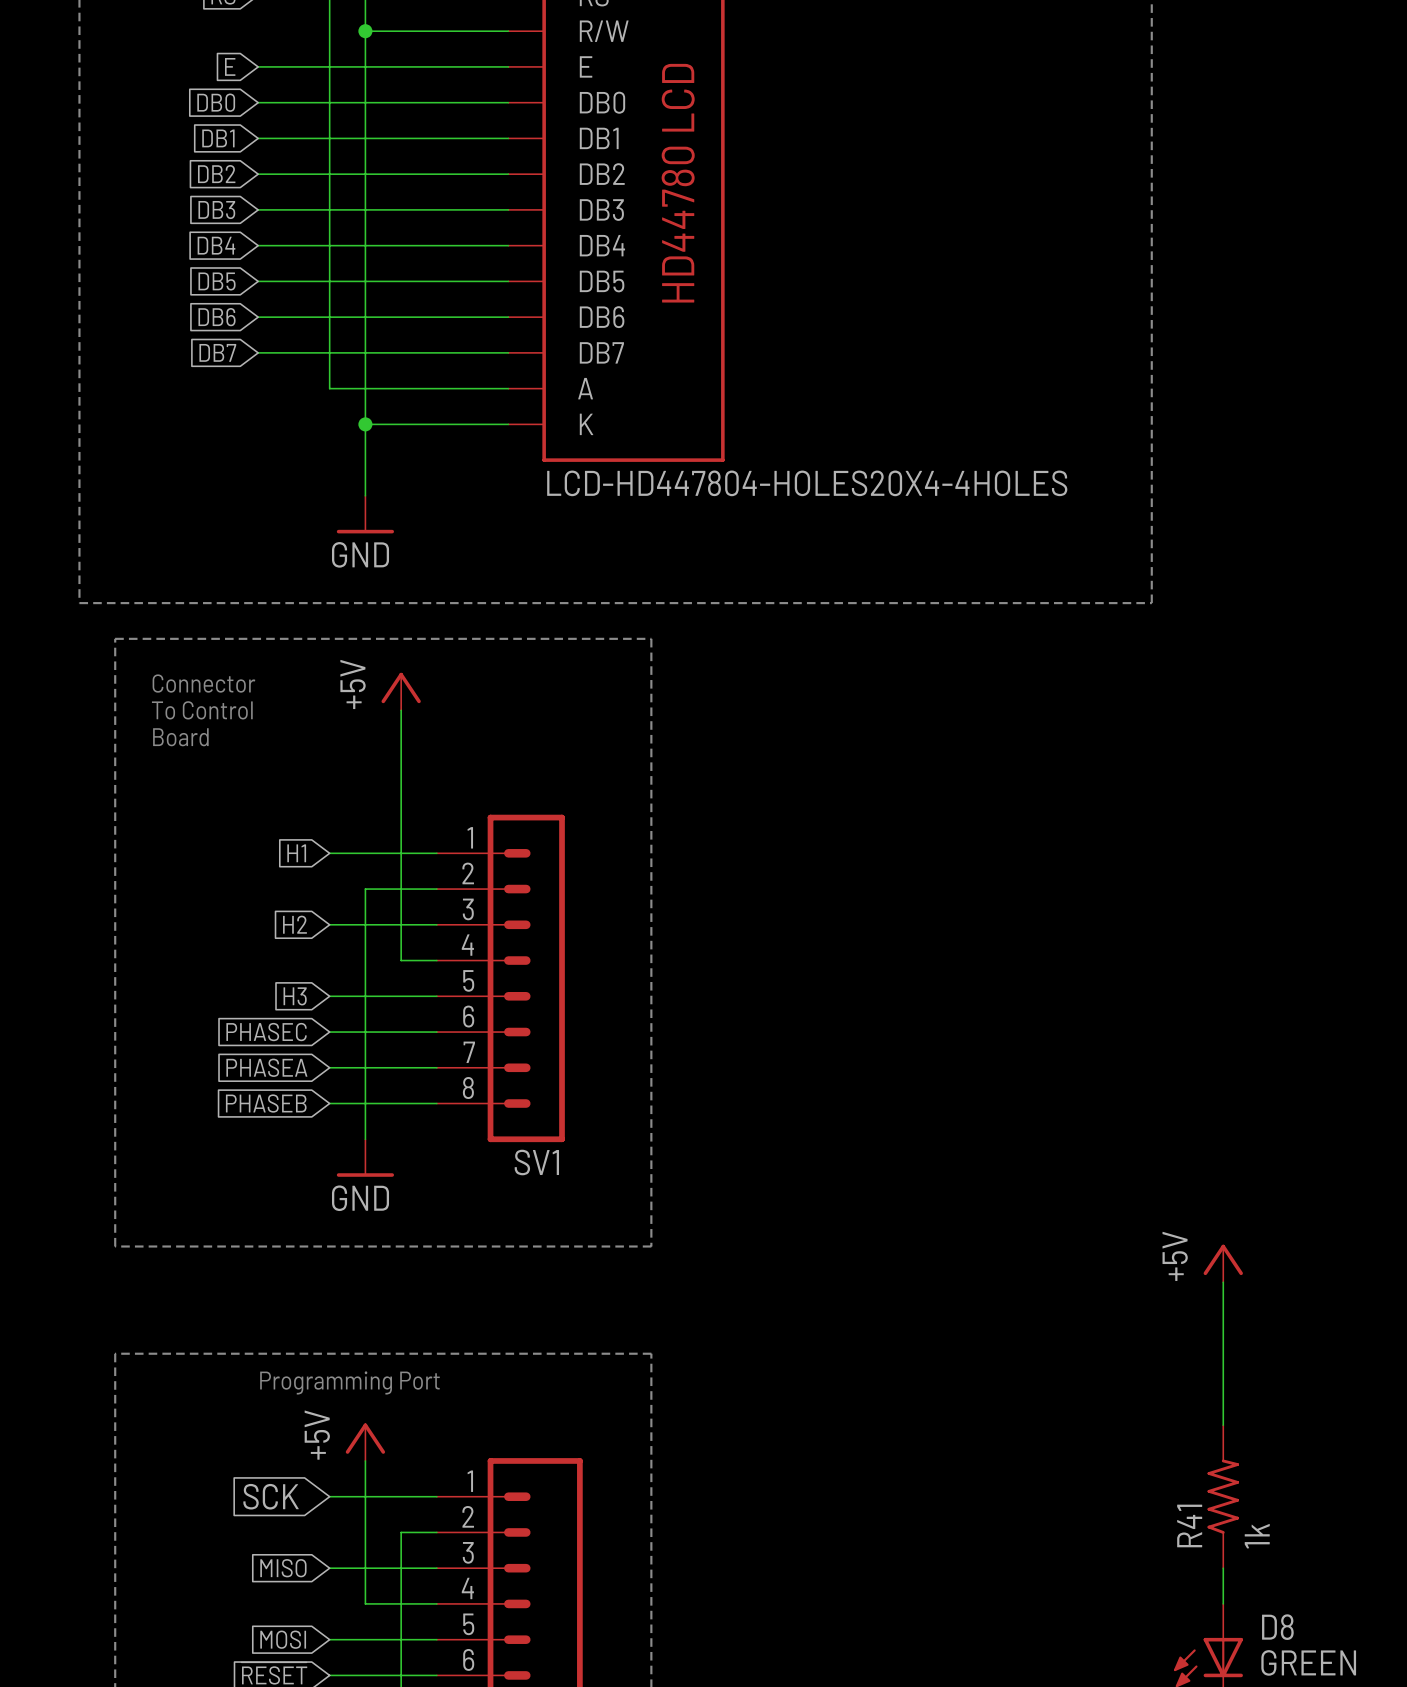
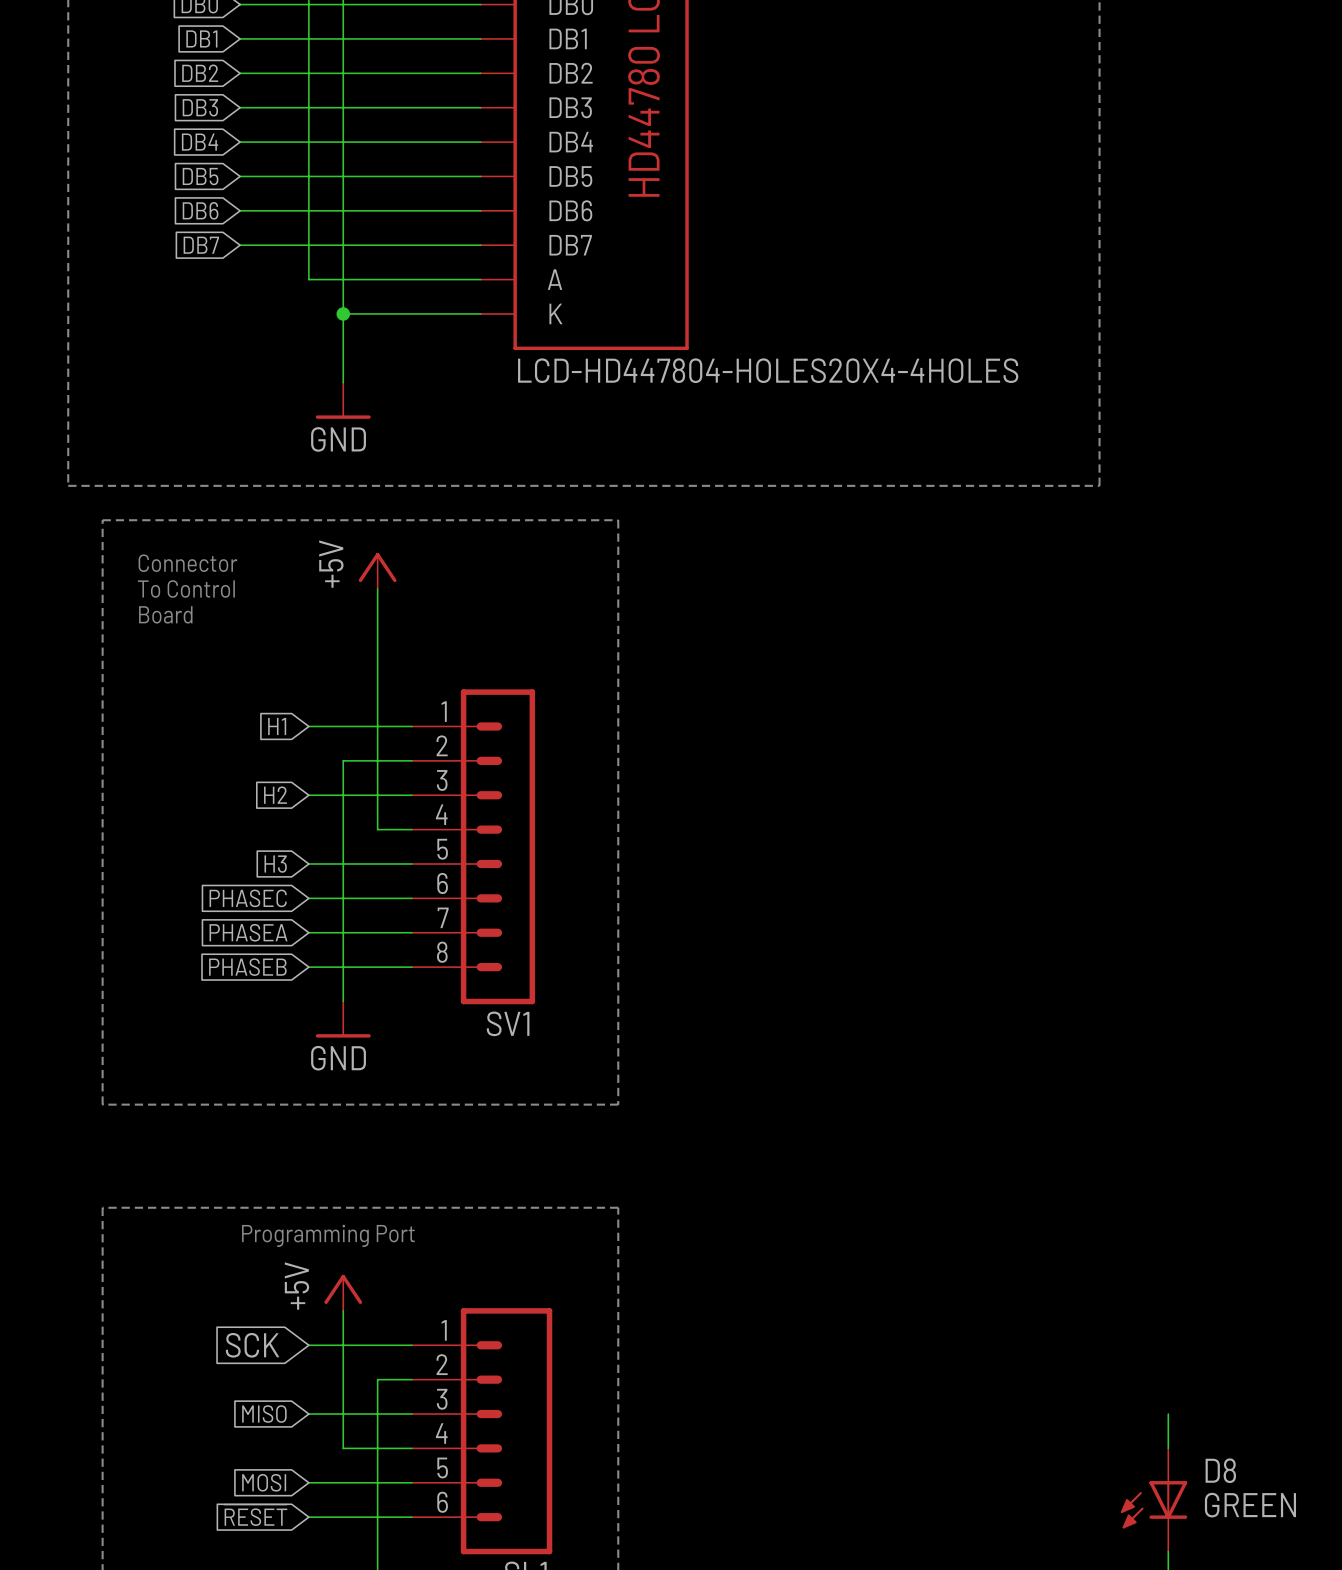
power symbol: +5V (1223, 1263) -> none
wire: (1223, 1282) (1223, 1425) -> none
R41: 1k (1223, 1496) -> none

